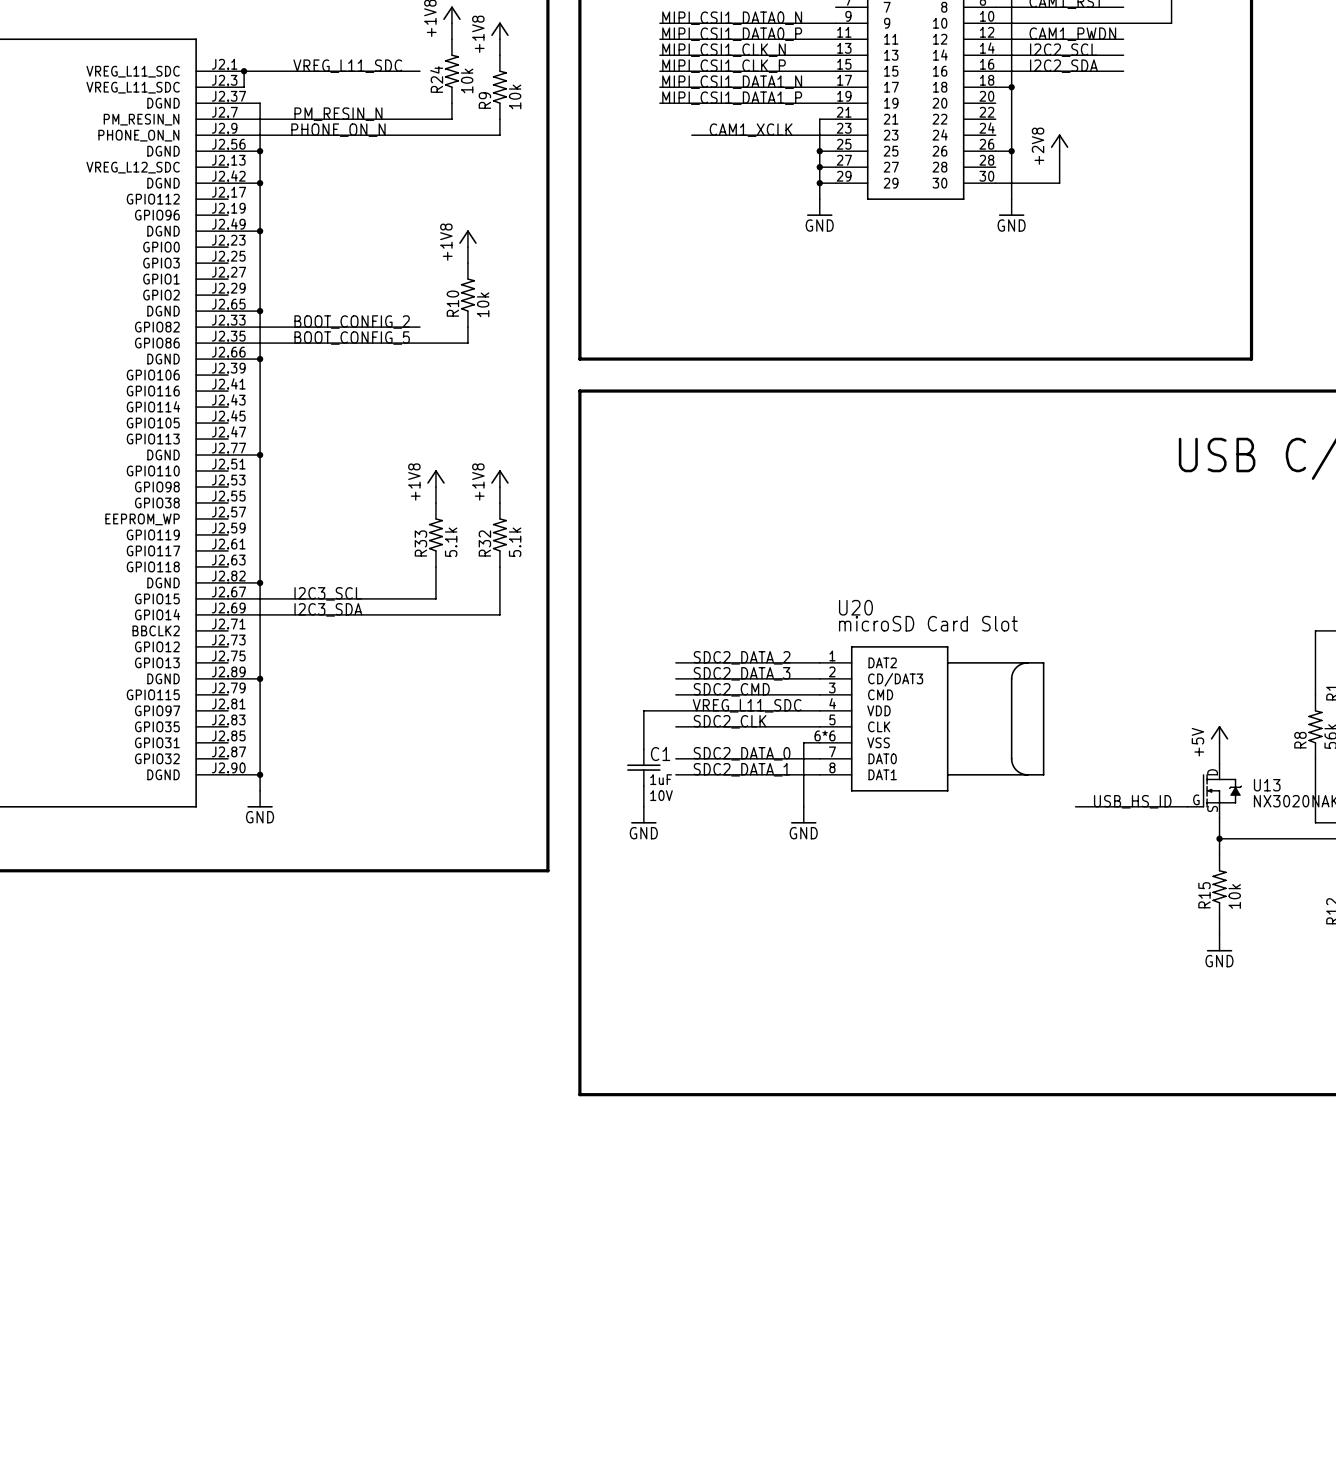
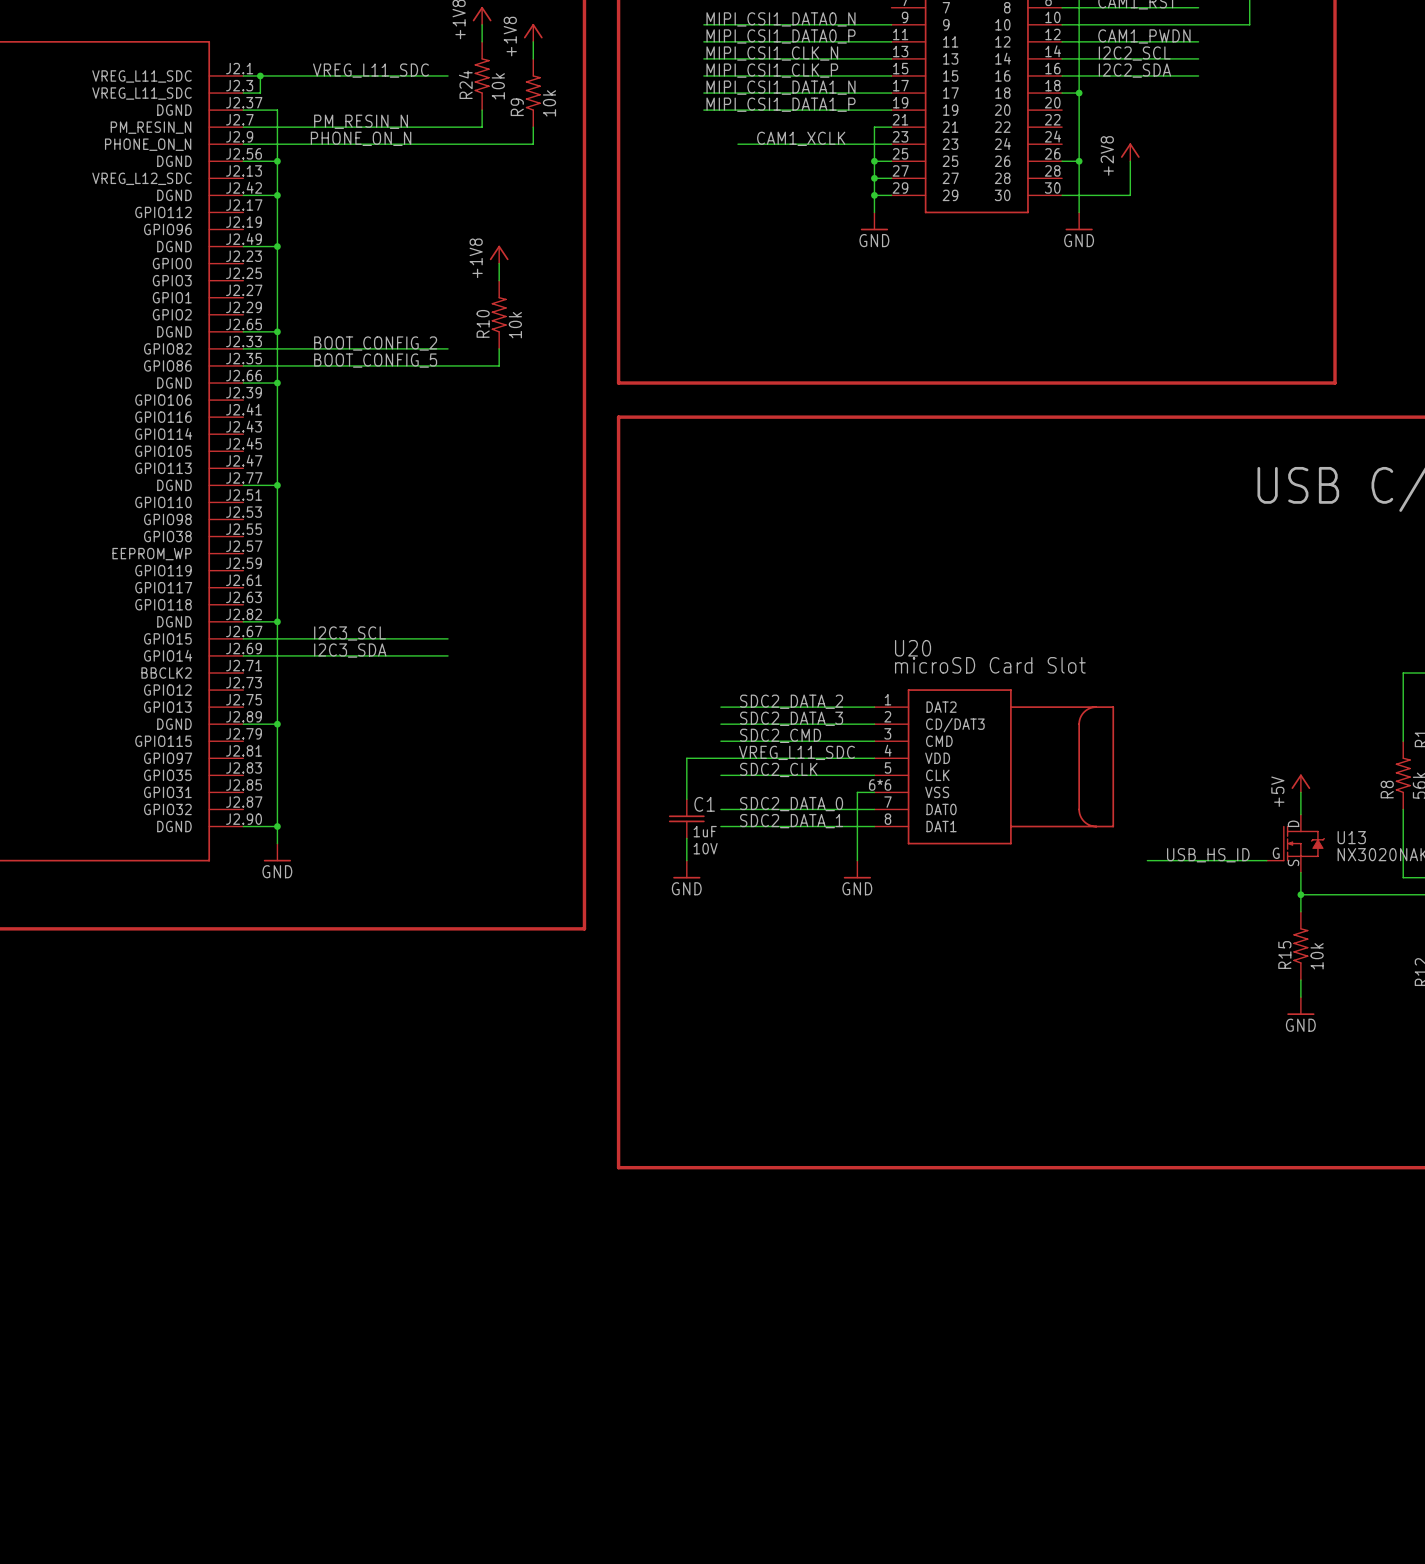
power symbol: +1V8 (435, 478) -> none
power symbol: +1V8 (499, 478) -> none
wire: (435, 486) (435, 502) -> none
wire: (499, 486) (499, 502) -> none
R33: 5.1k (435, 534) -> none
R32: 5.1k (499, 534) -> none
wire: (435, 566) (435, 598) (419, 598) -> none
wire: (499, 566) (499, 614) (419, 614) -> none

